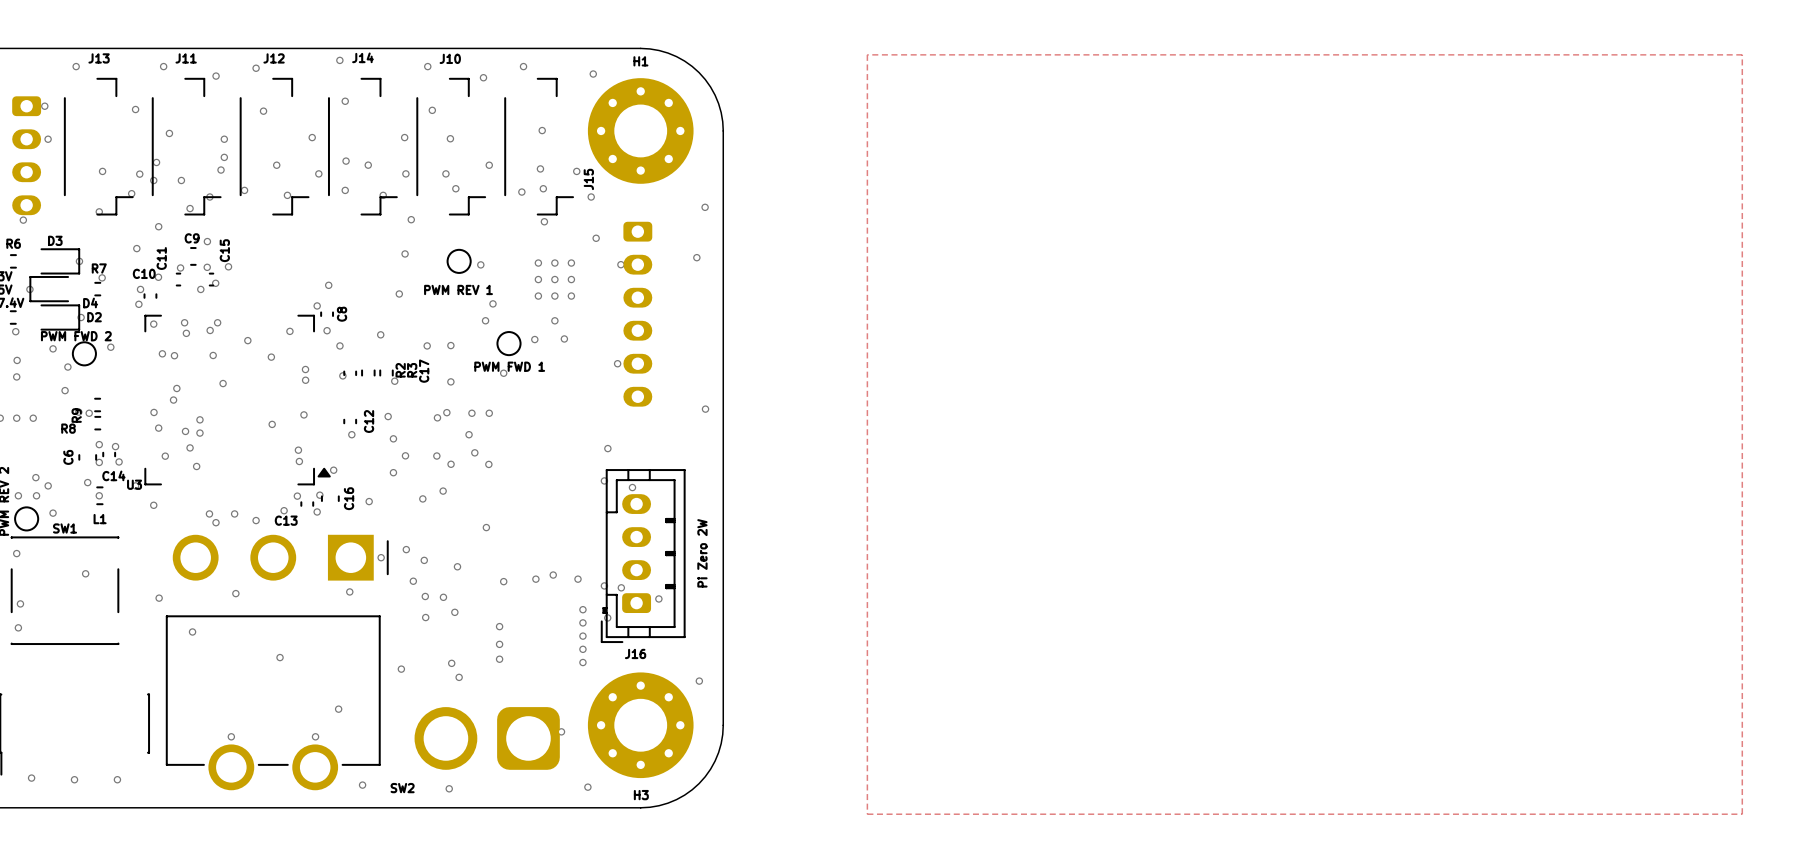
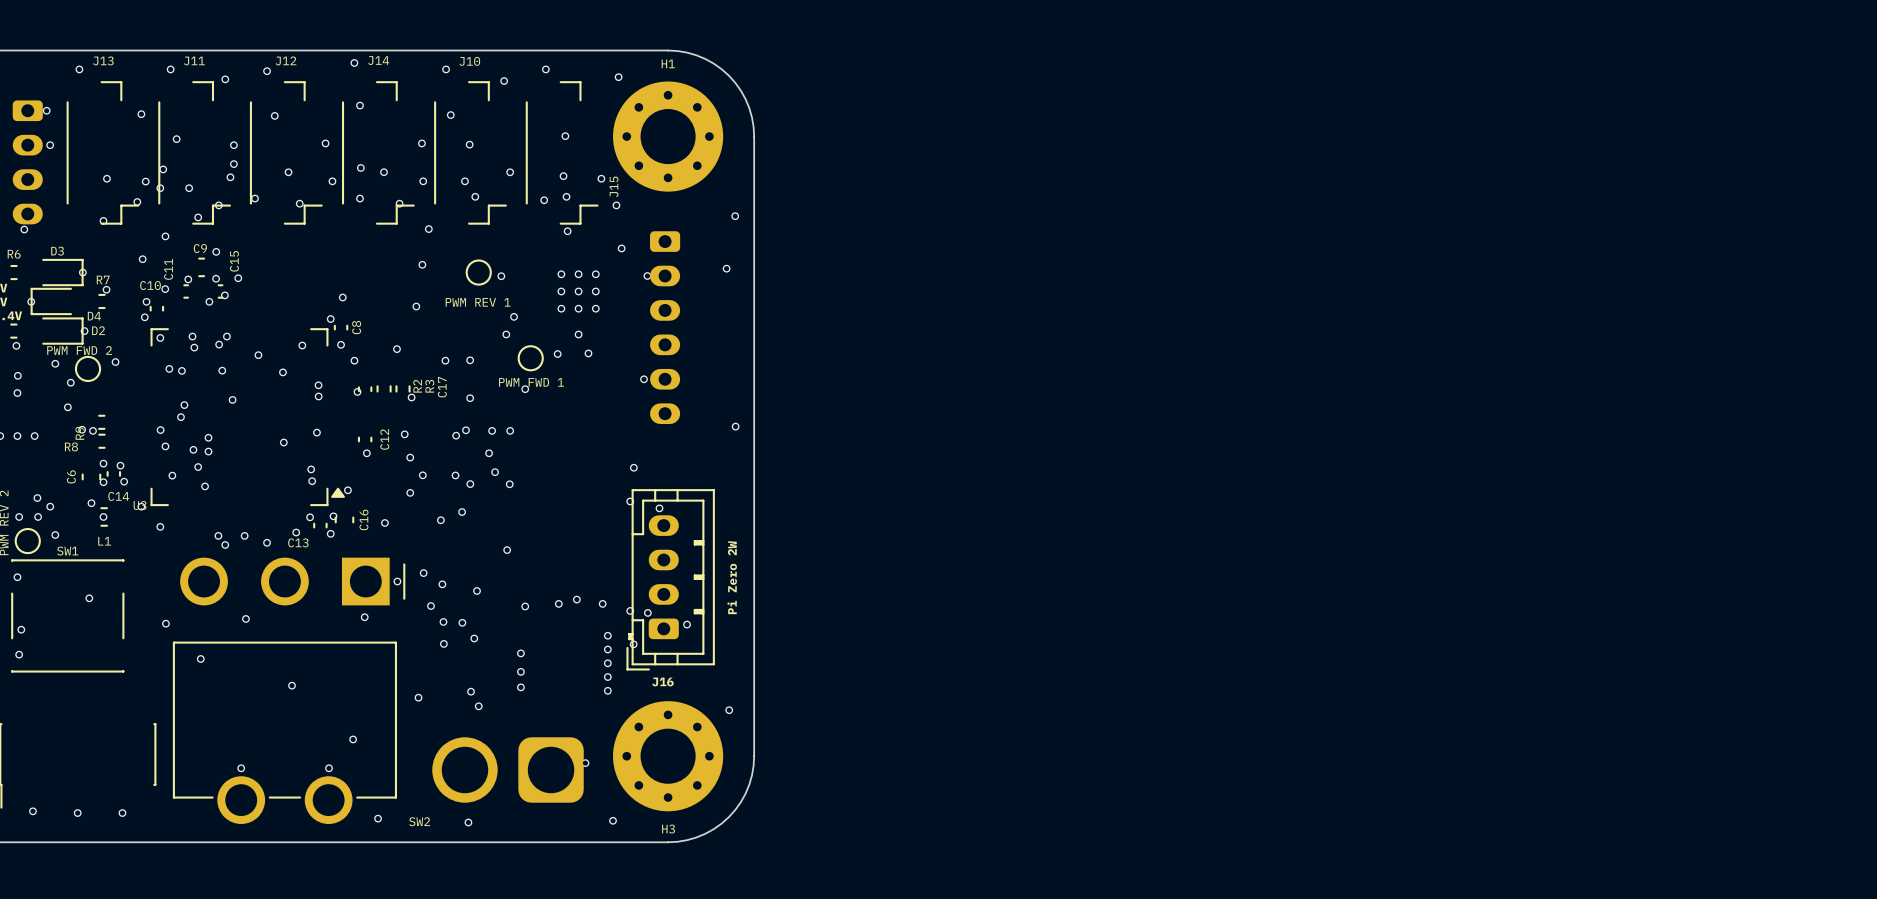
zone outline: (867, 54) (1742, 54) (1742, 814) (867, 814) (867, 54) -> none

